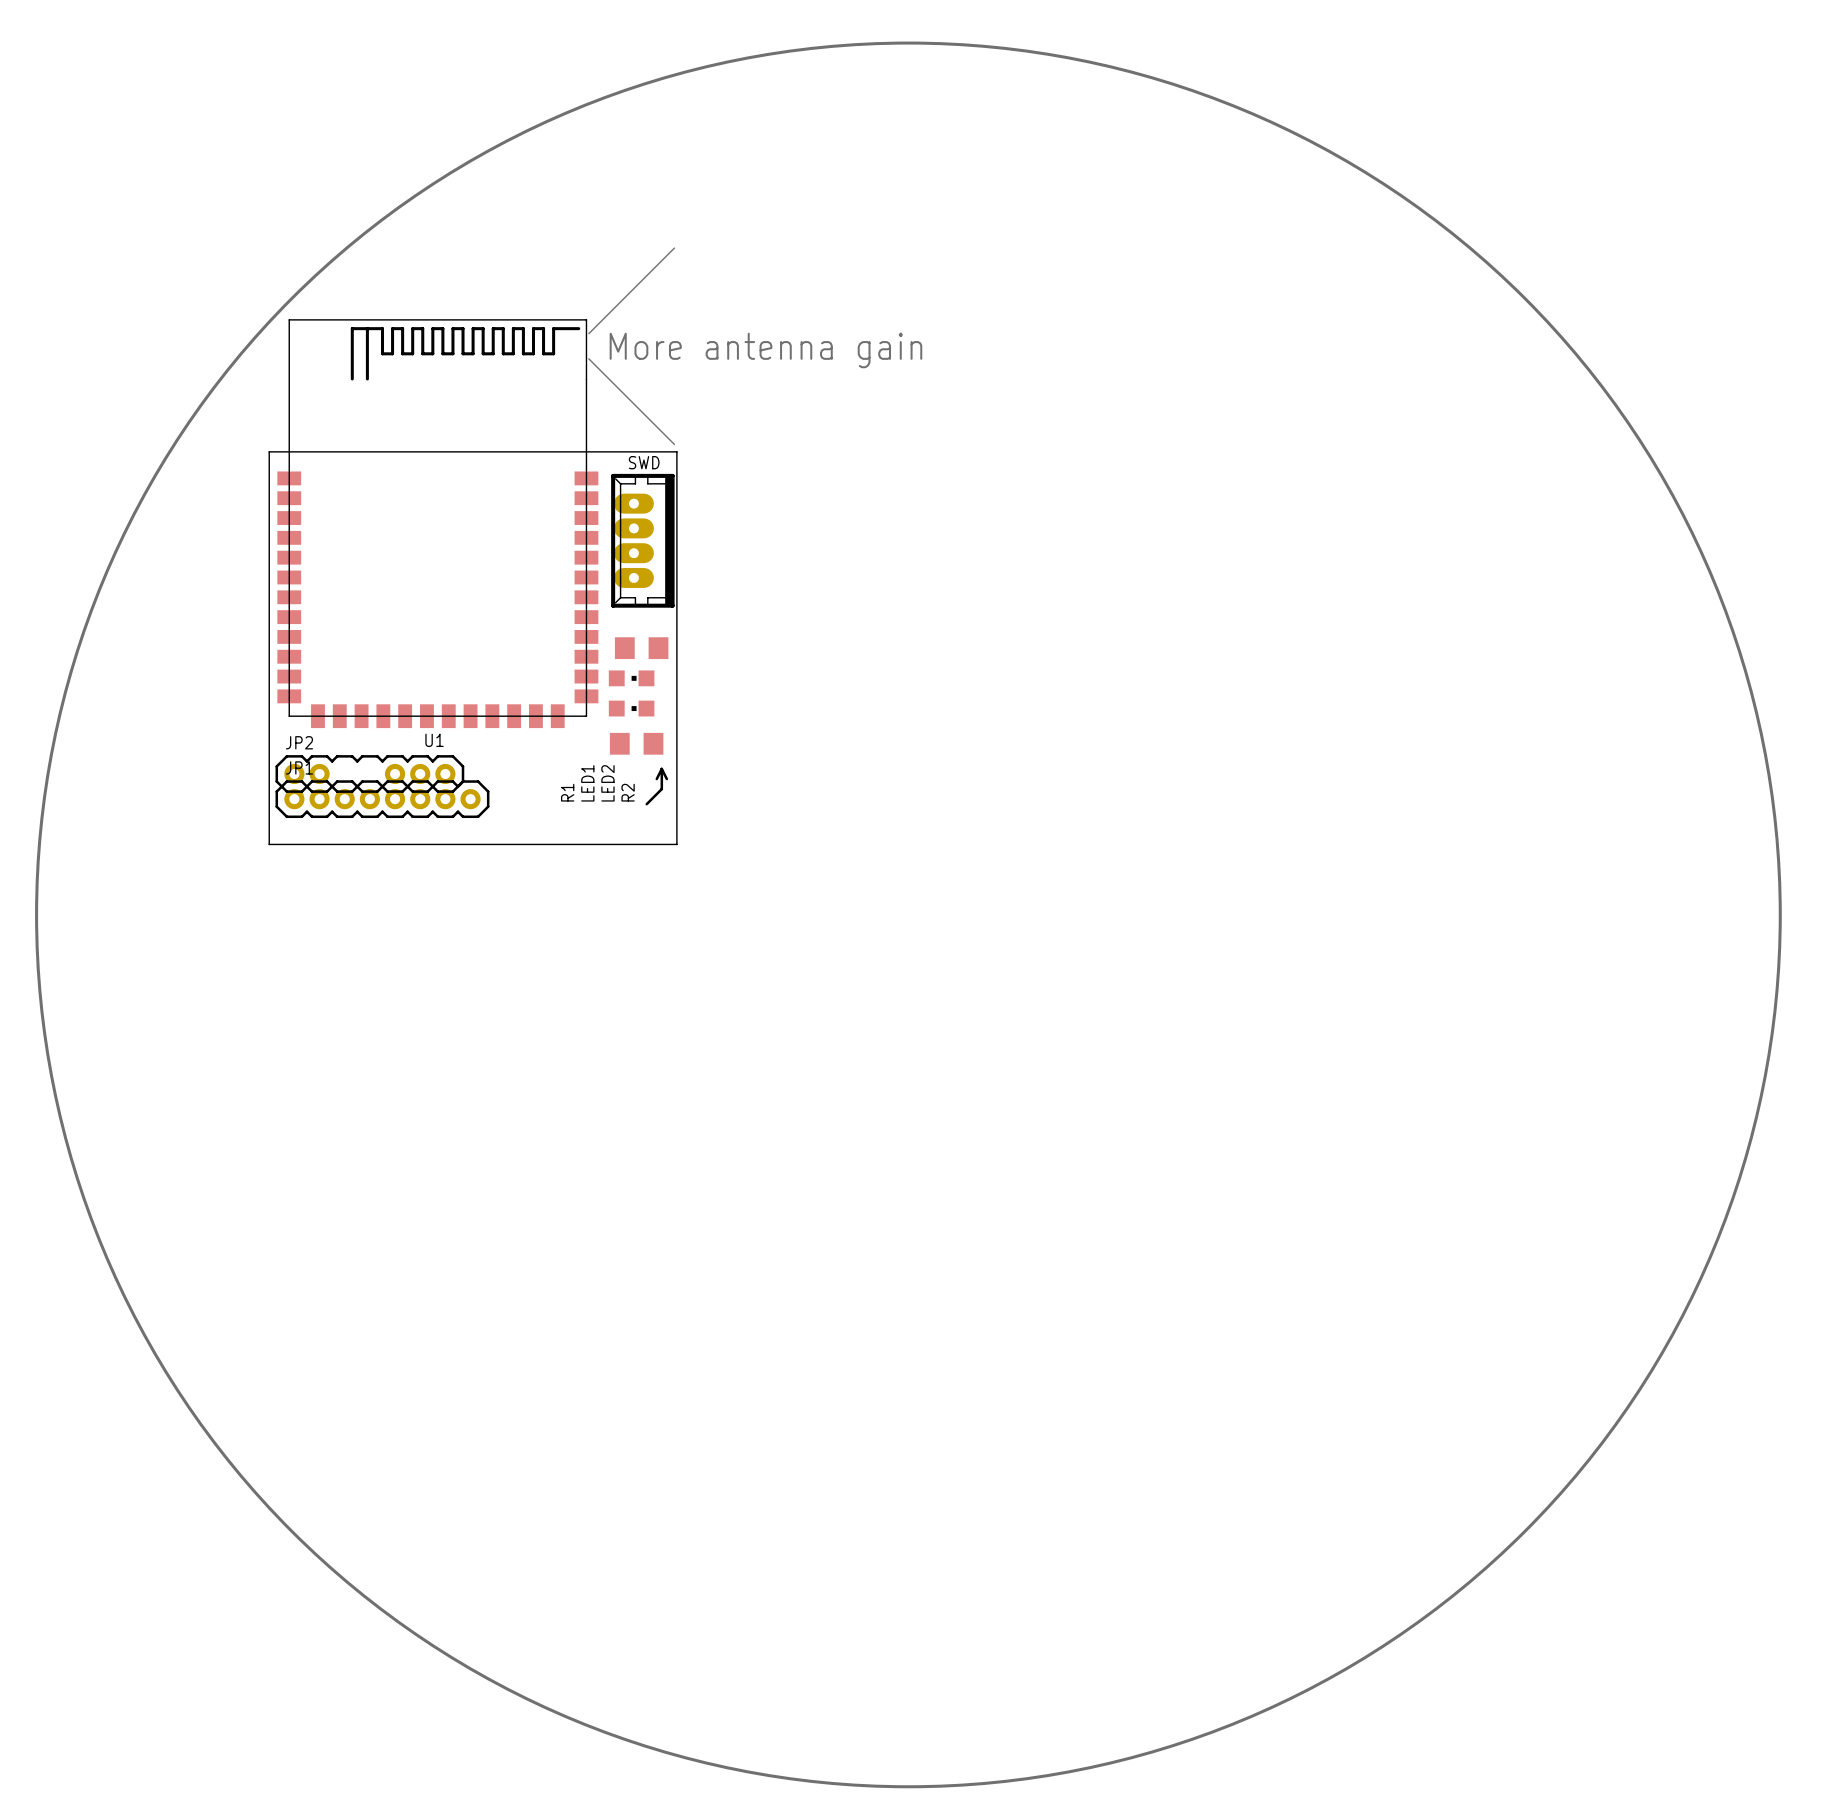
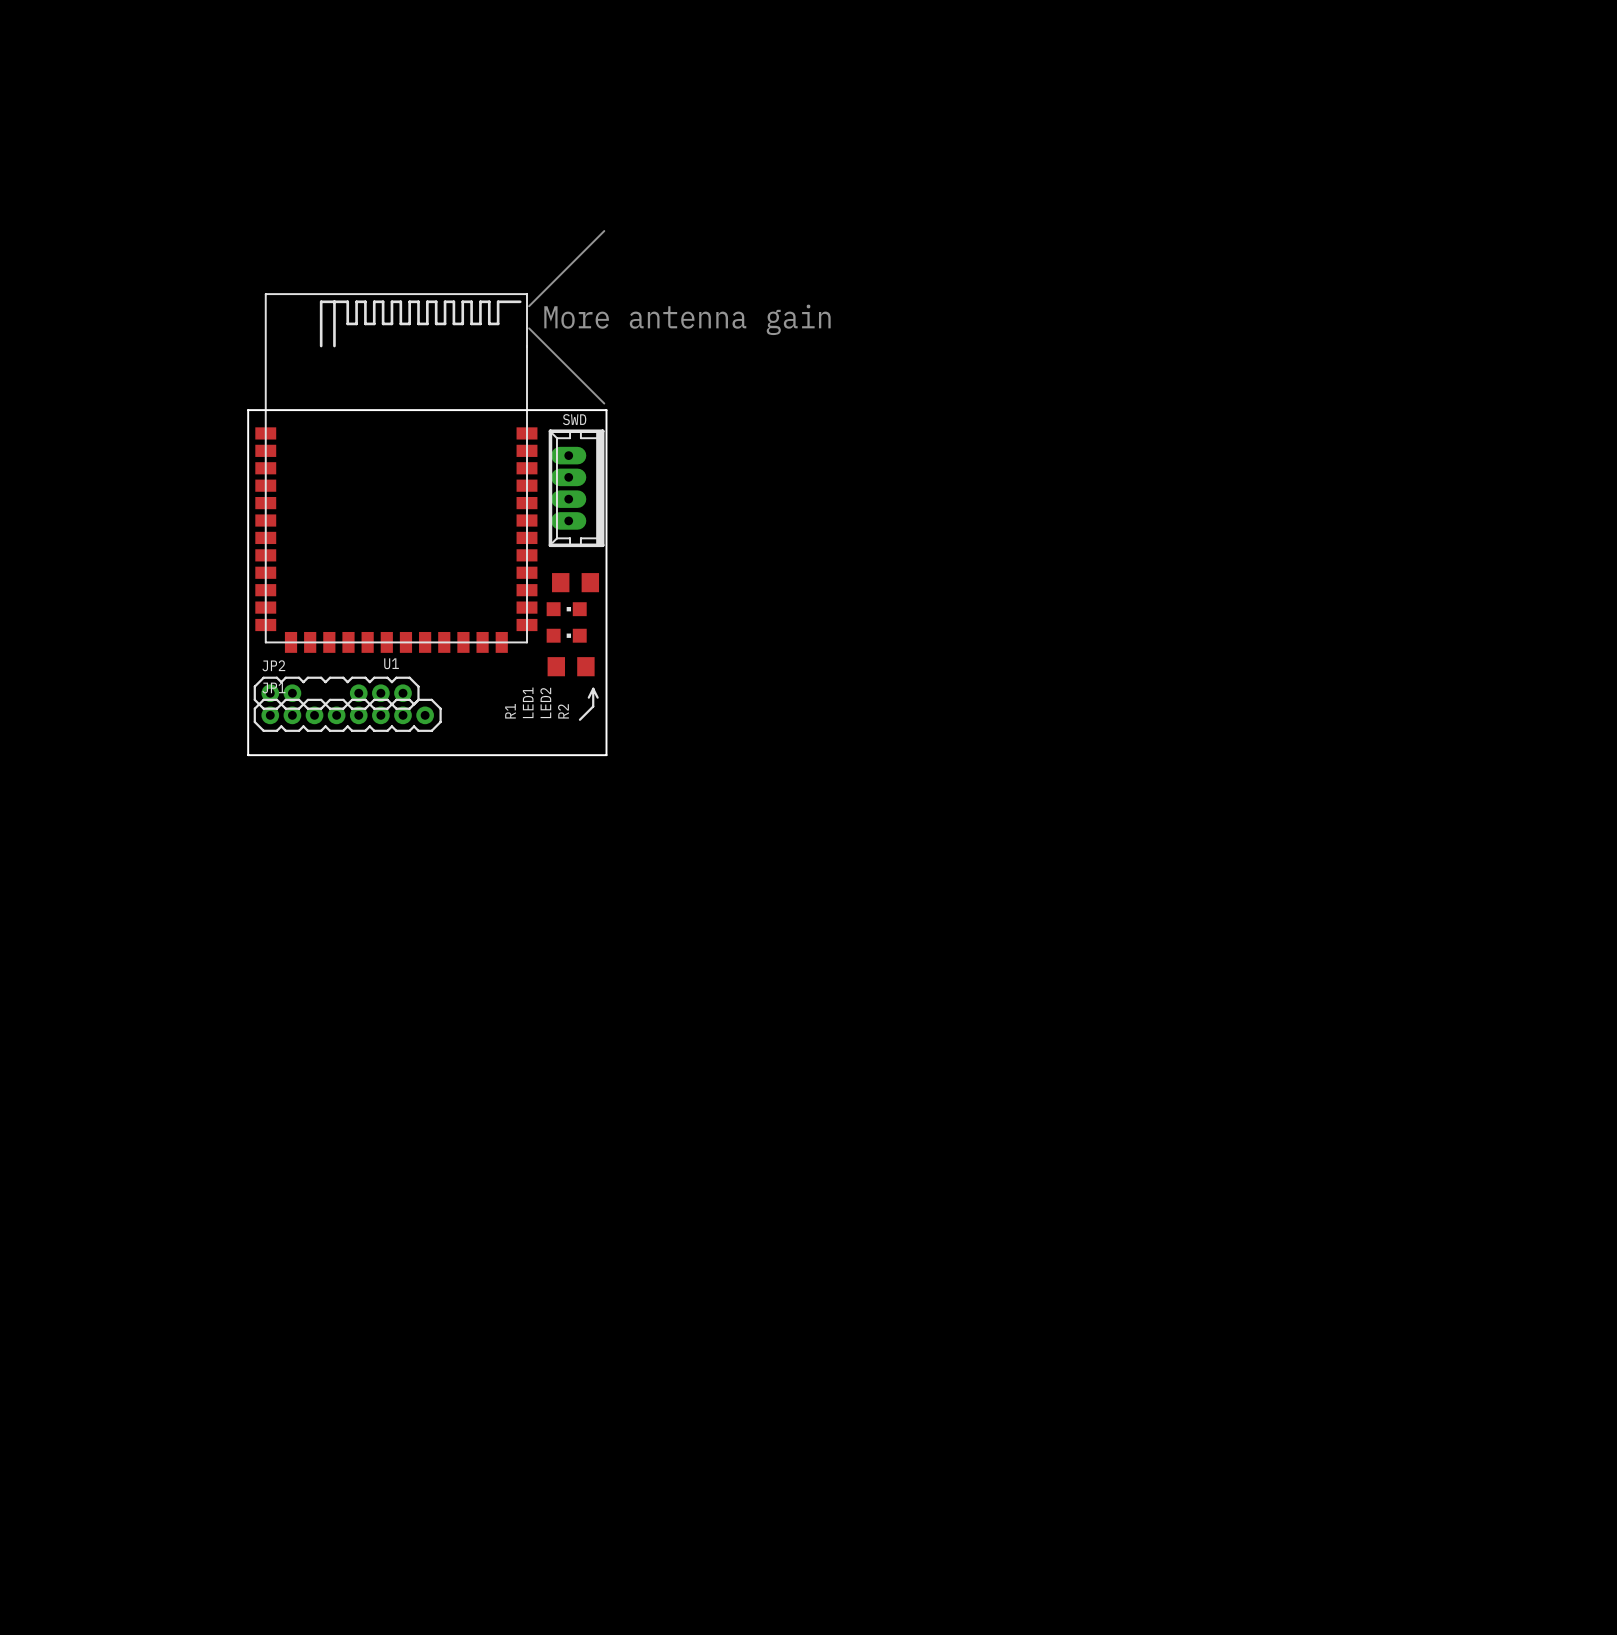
drawing: [35, 41, 1782, 1789] -> none

